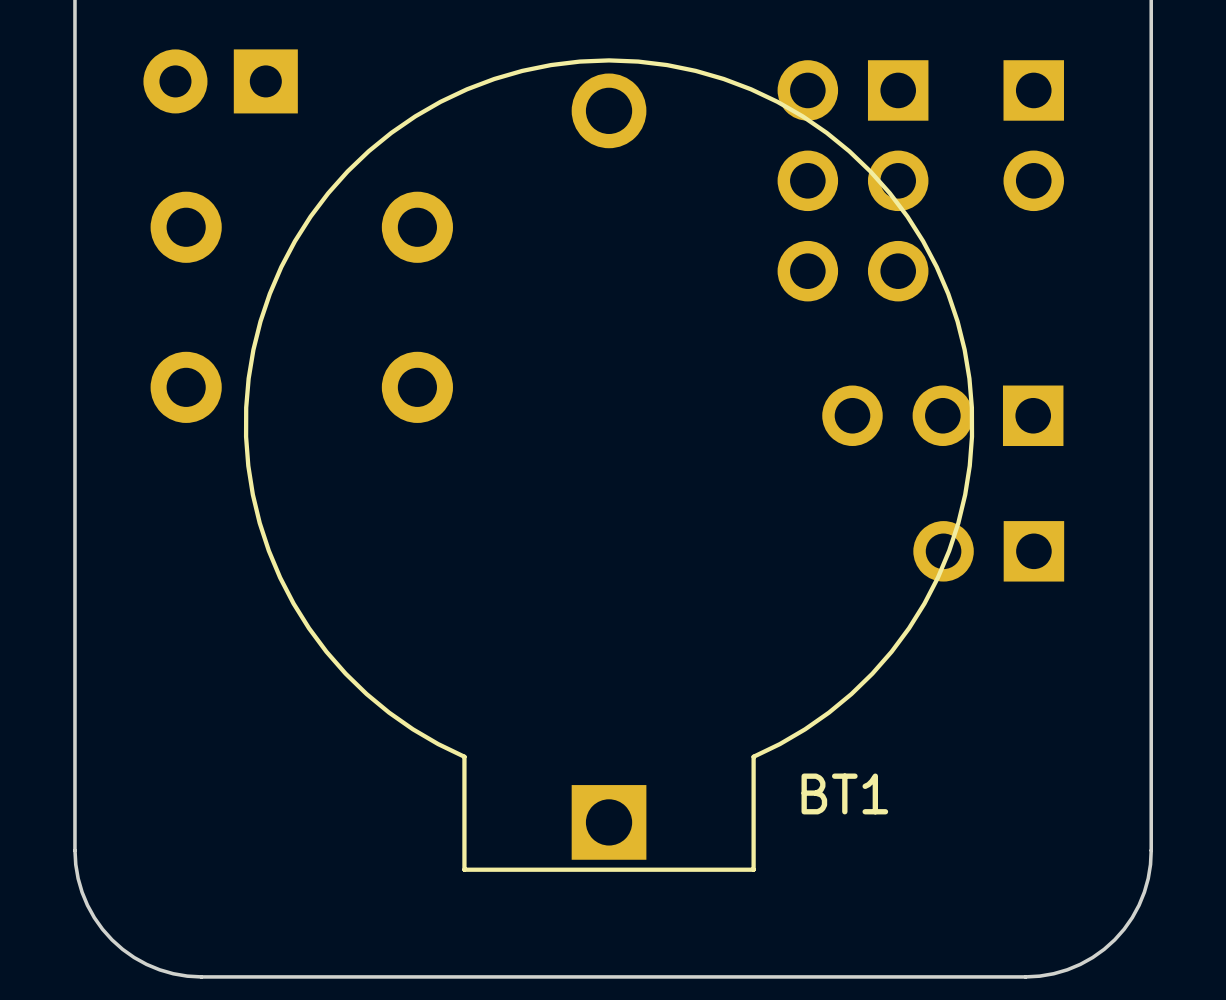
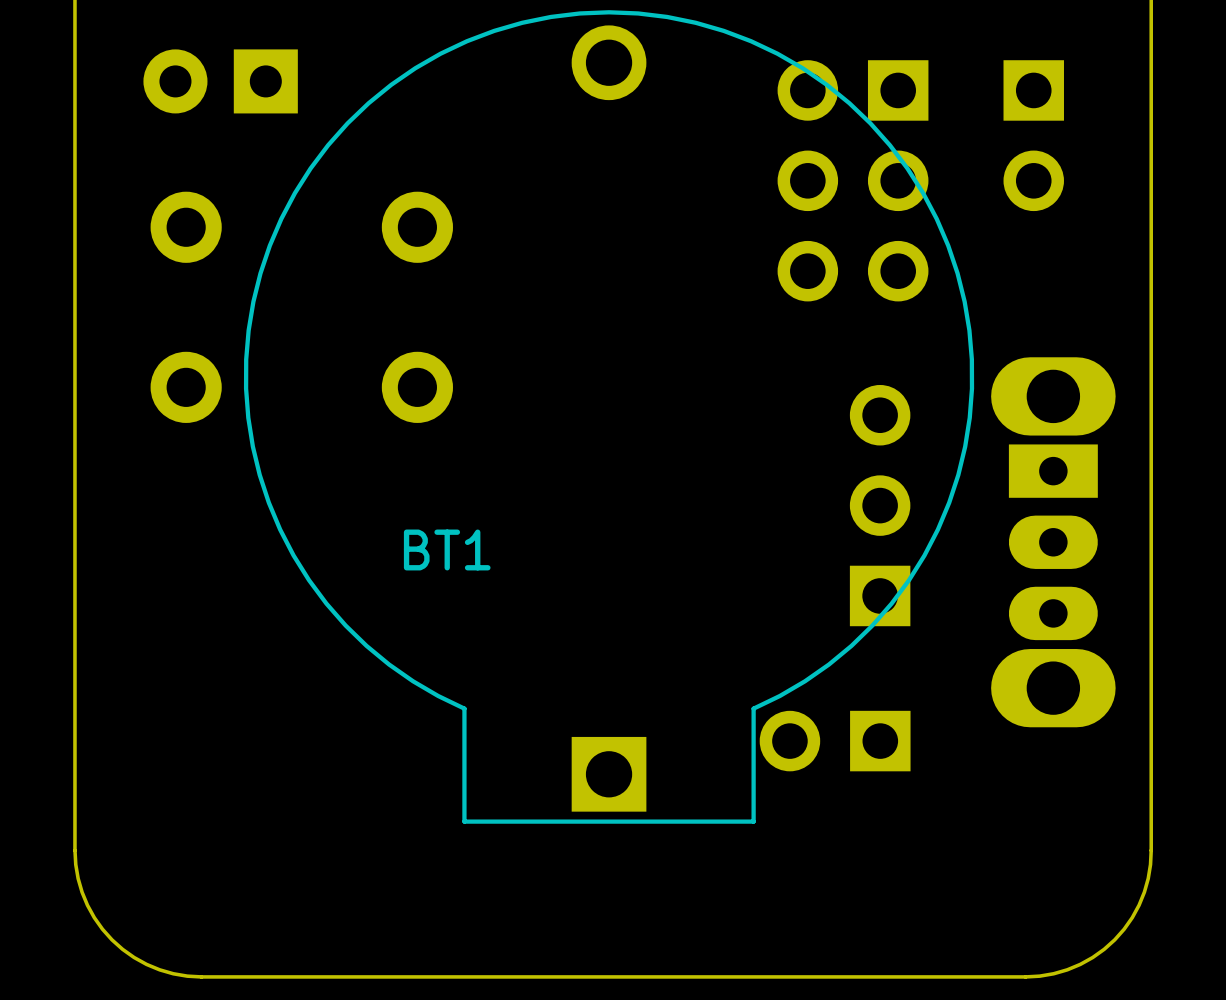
part rotation: 0° (942, 415) -> 90° clockwise (880, 505)
BT1 position: (609, 465) -> (609, 416)
part: none -> (1053, 542)
part position: (988, 551) -> (835, 741)
BT1 name position: BT1 (844, 793) -> BT1 (447, 549)

